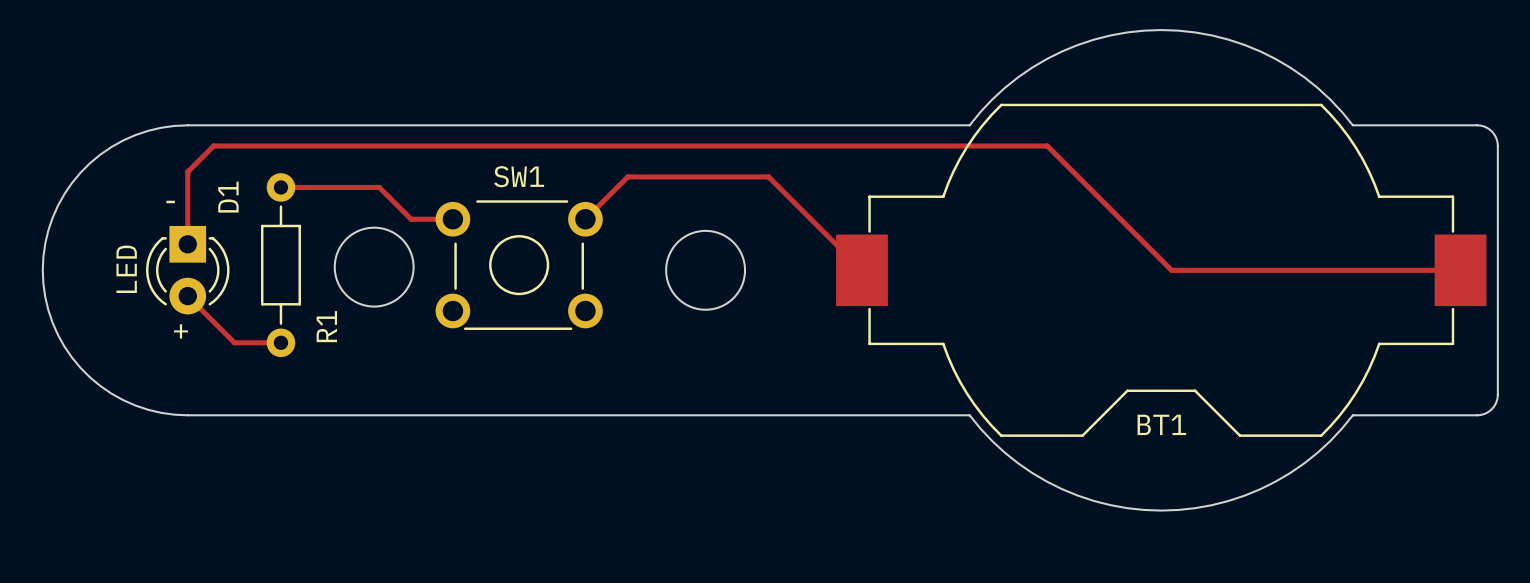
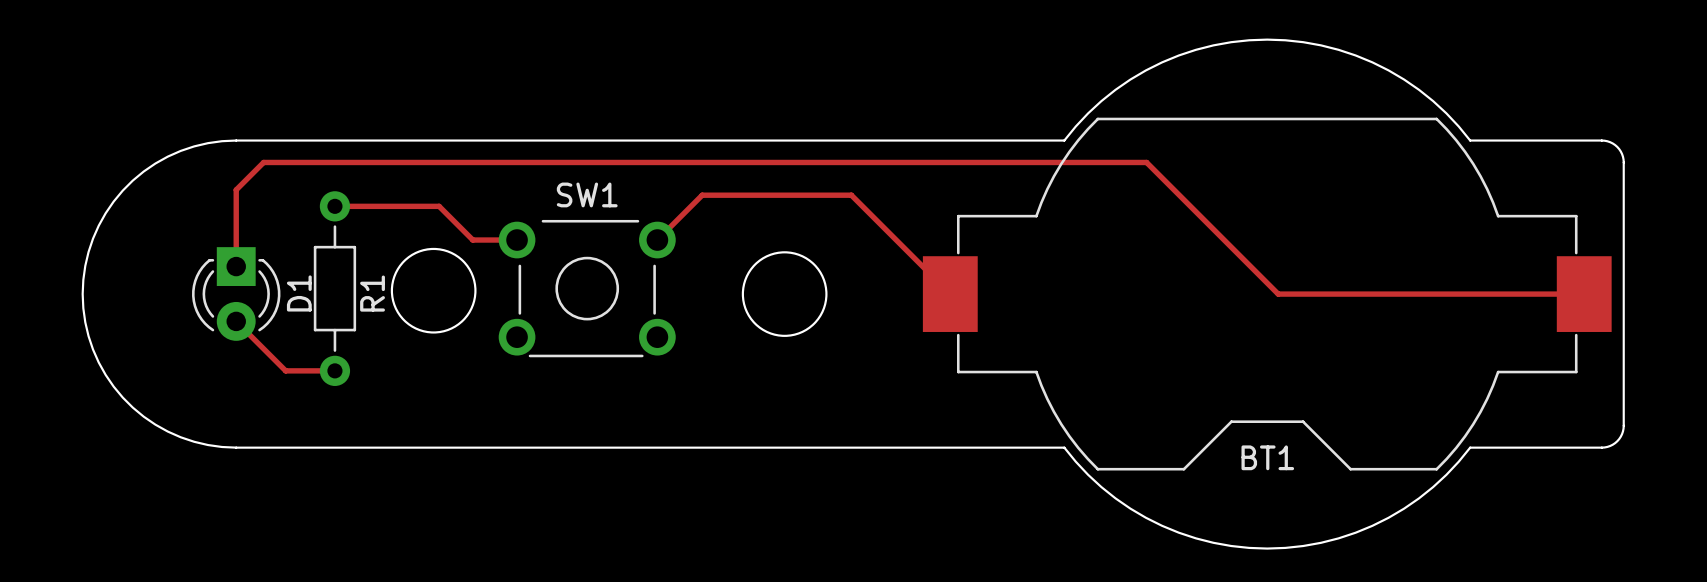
D1 name position: D1 (228, 197) -> D1 (299, 293)
text: - (170, 201) -> none
D1 value: LED (126, 269) -> none
R1 name position: R1 (326, 326) -> R1 (372, 293)
text: + (180, 331) -> none

